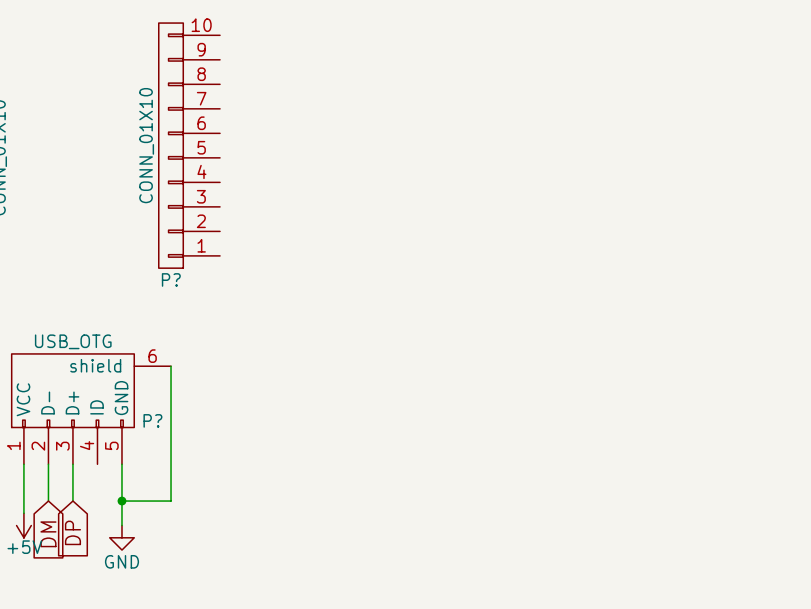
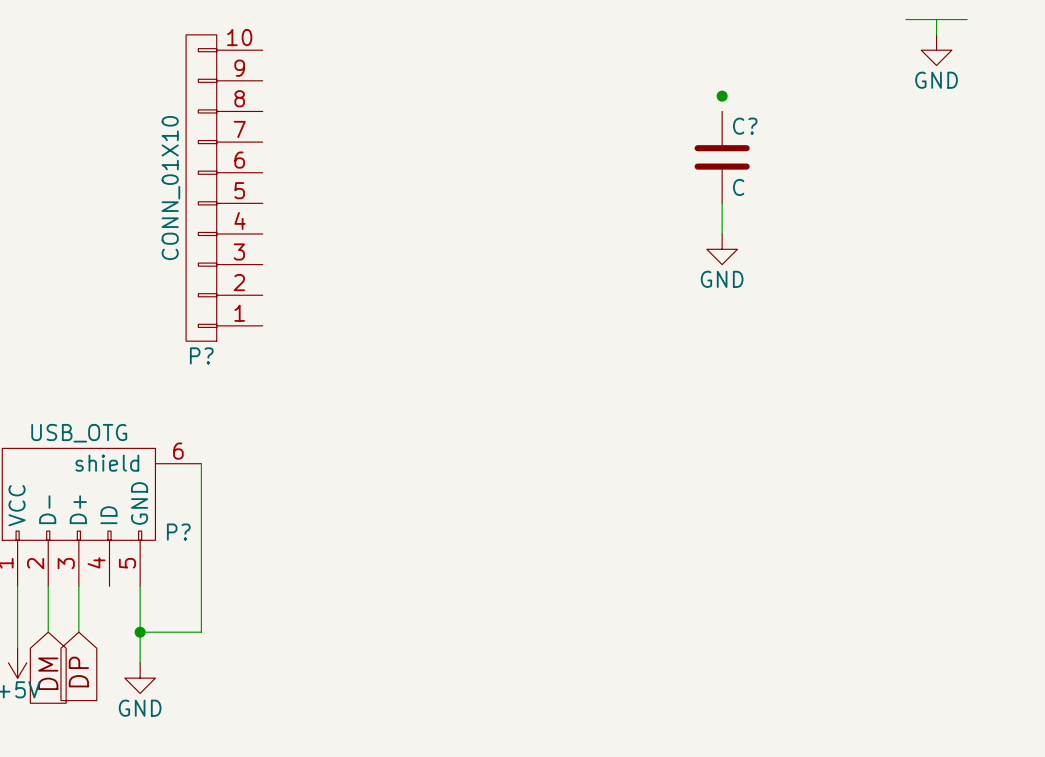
wire: none -> (905, 19) (967, 19)
wire: none -> (936, 19) (936, 34)
power symbol: none -> GND (936, 50)
junction: none -> (722, 96)
C?: none -> C (722, 157)
wire: none -> (722, 203) (722, 233)
power symbol: none -> GND (722, 249)

